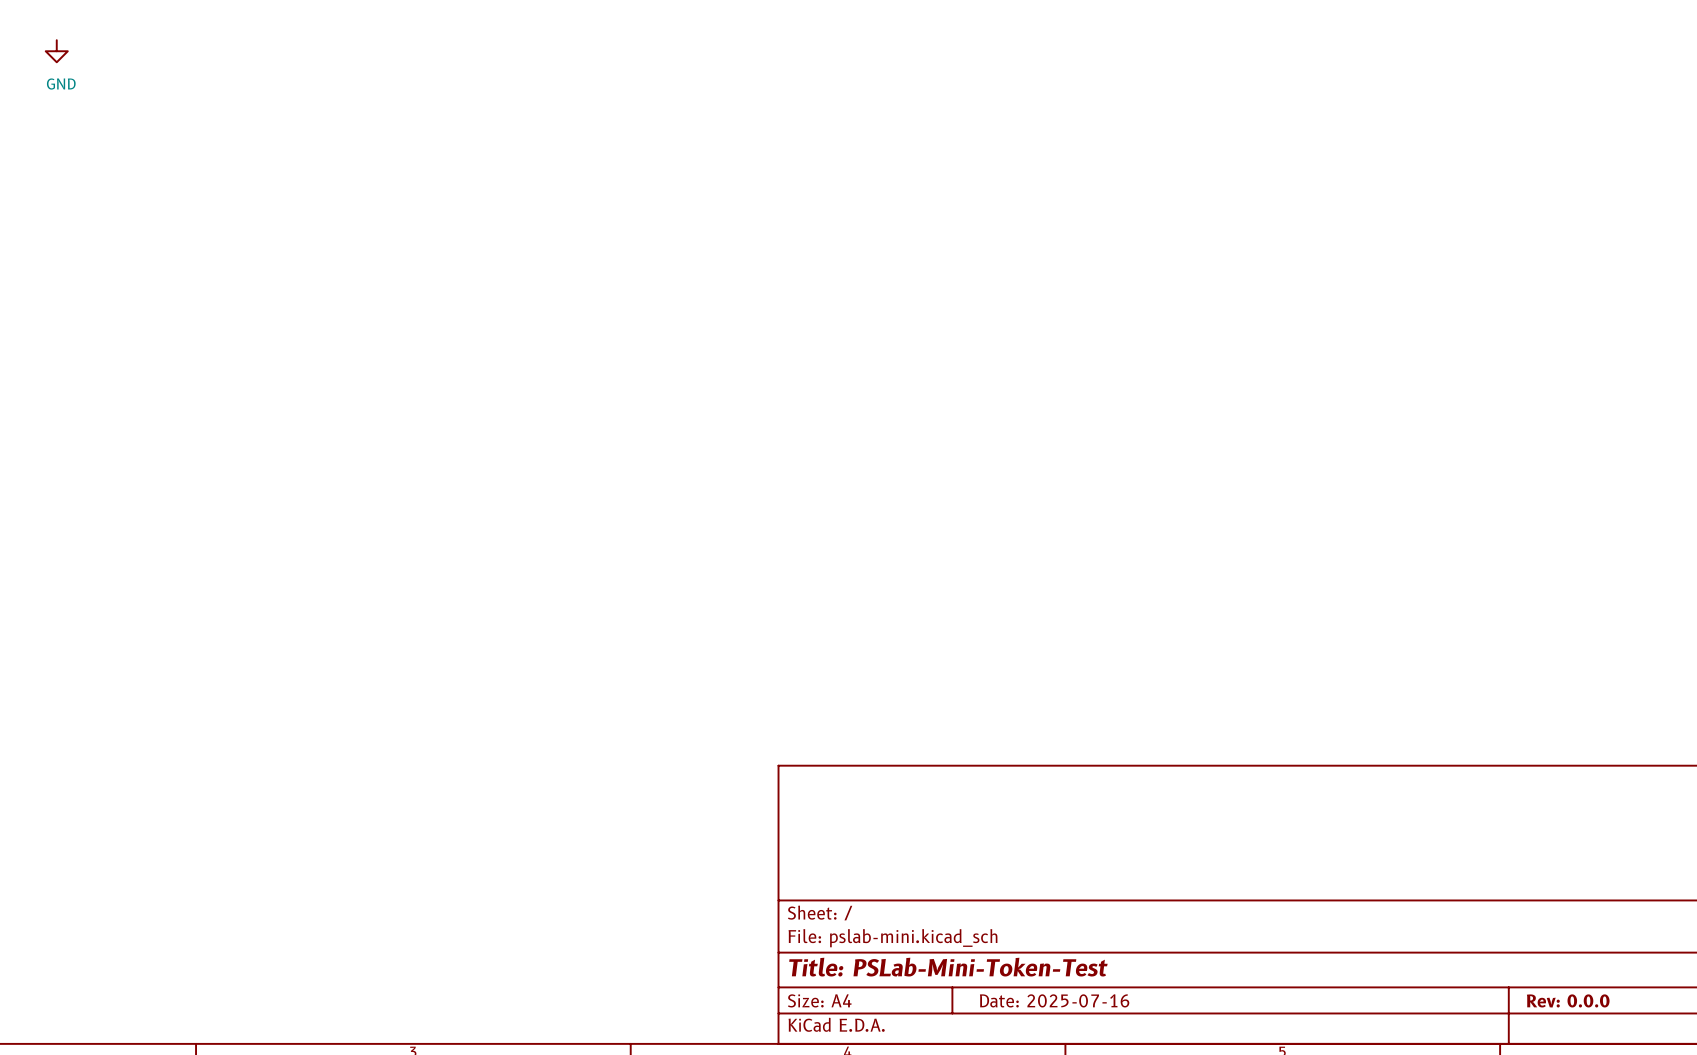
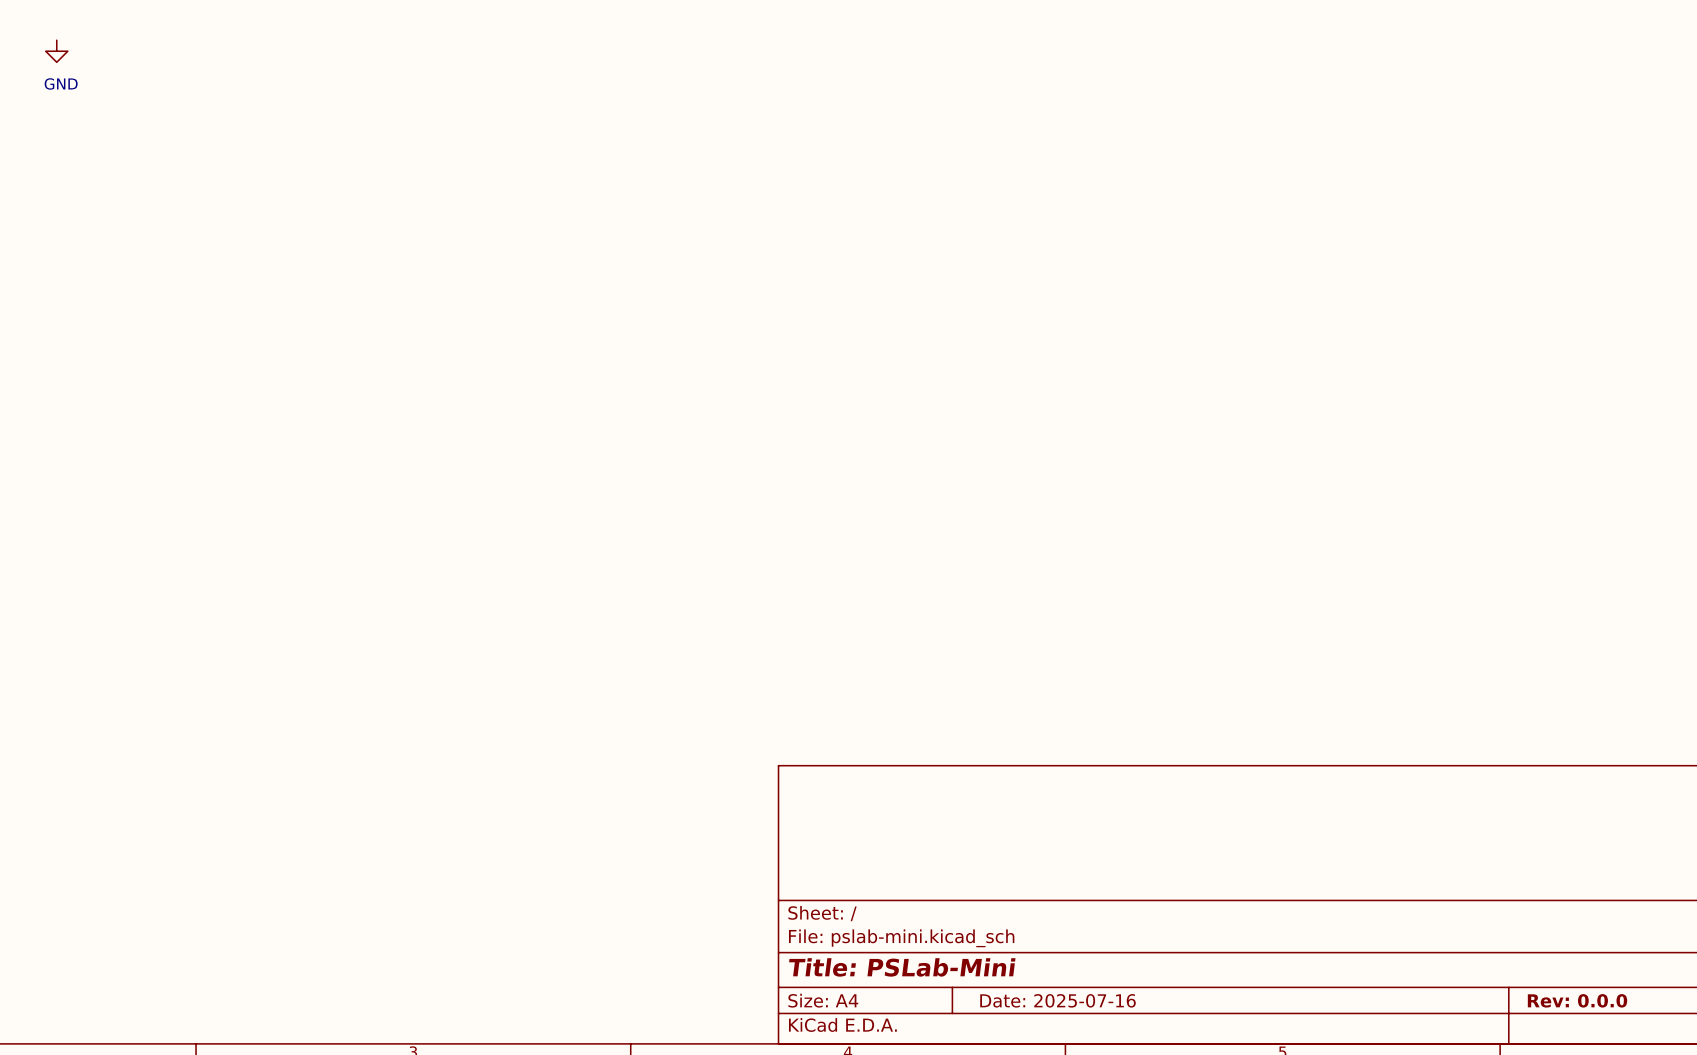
title block: Title: PSLab-Mini-Token-Test (948, 967) -> Title: PSLab-Mini (902, 967)

